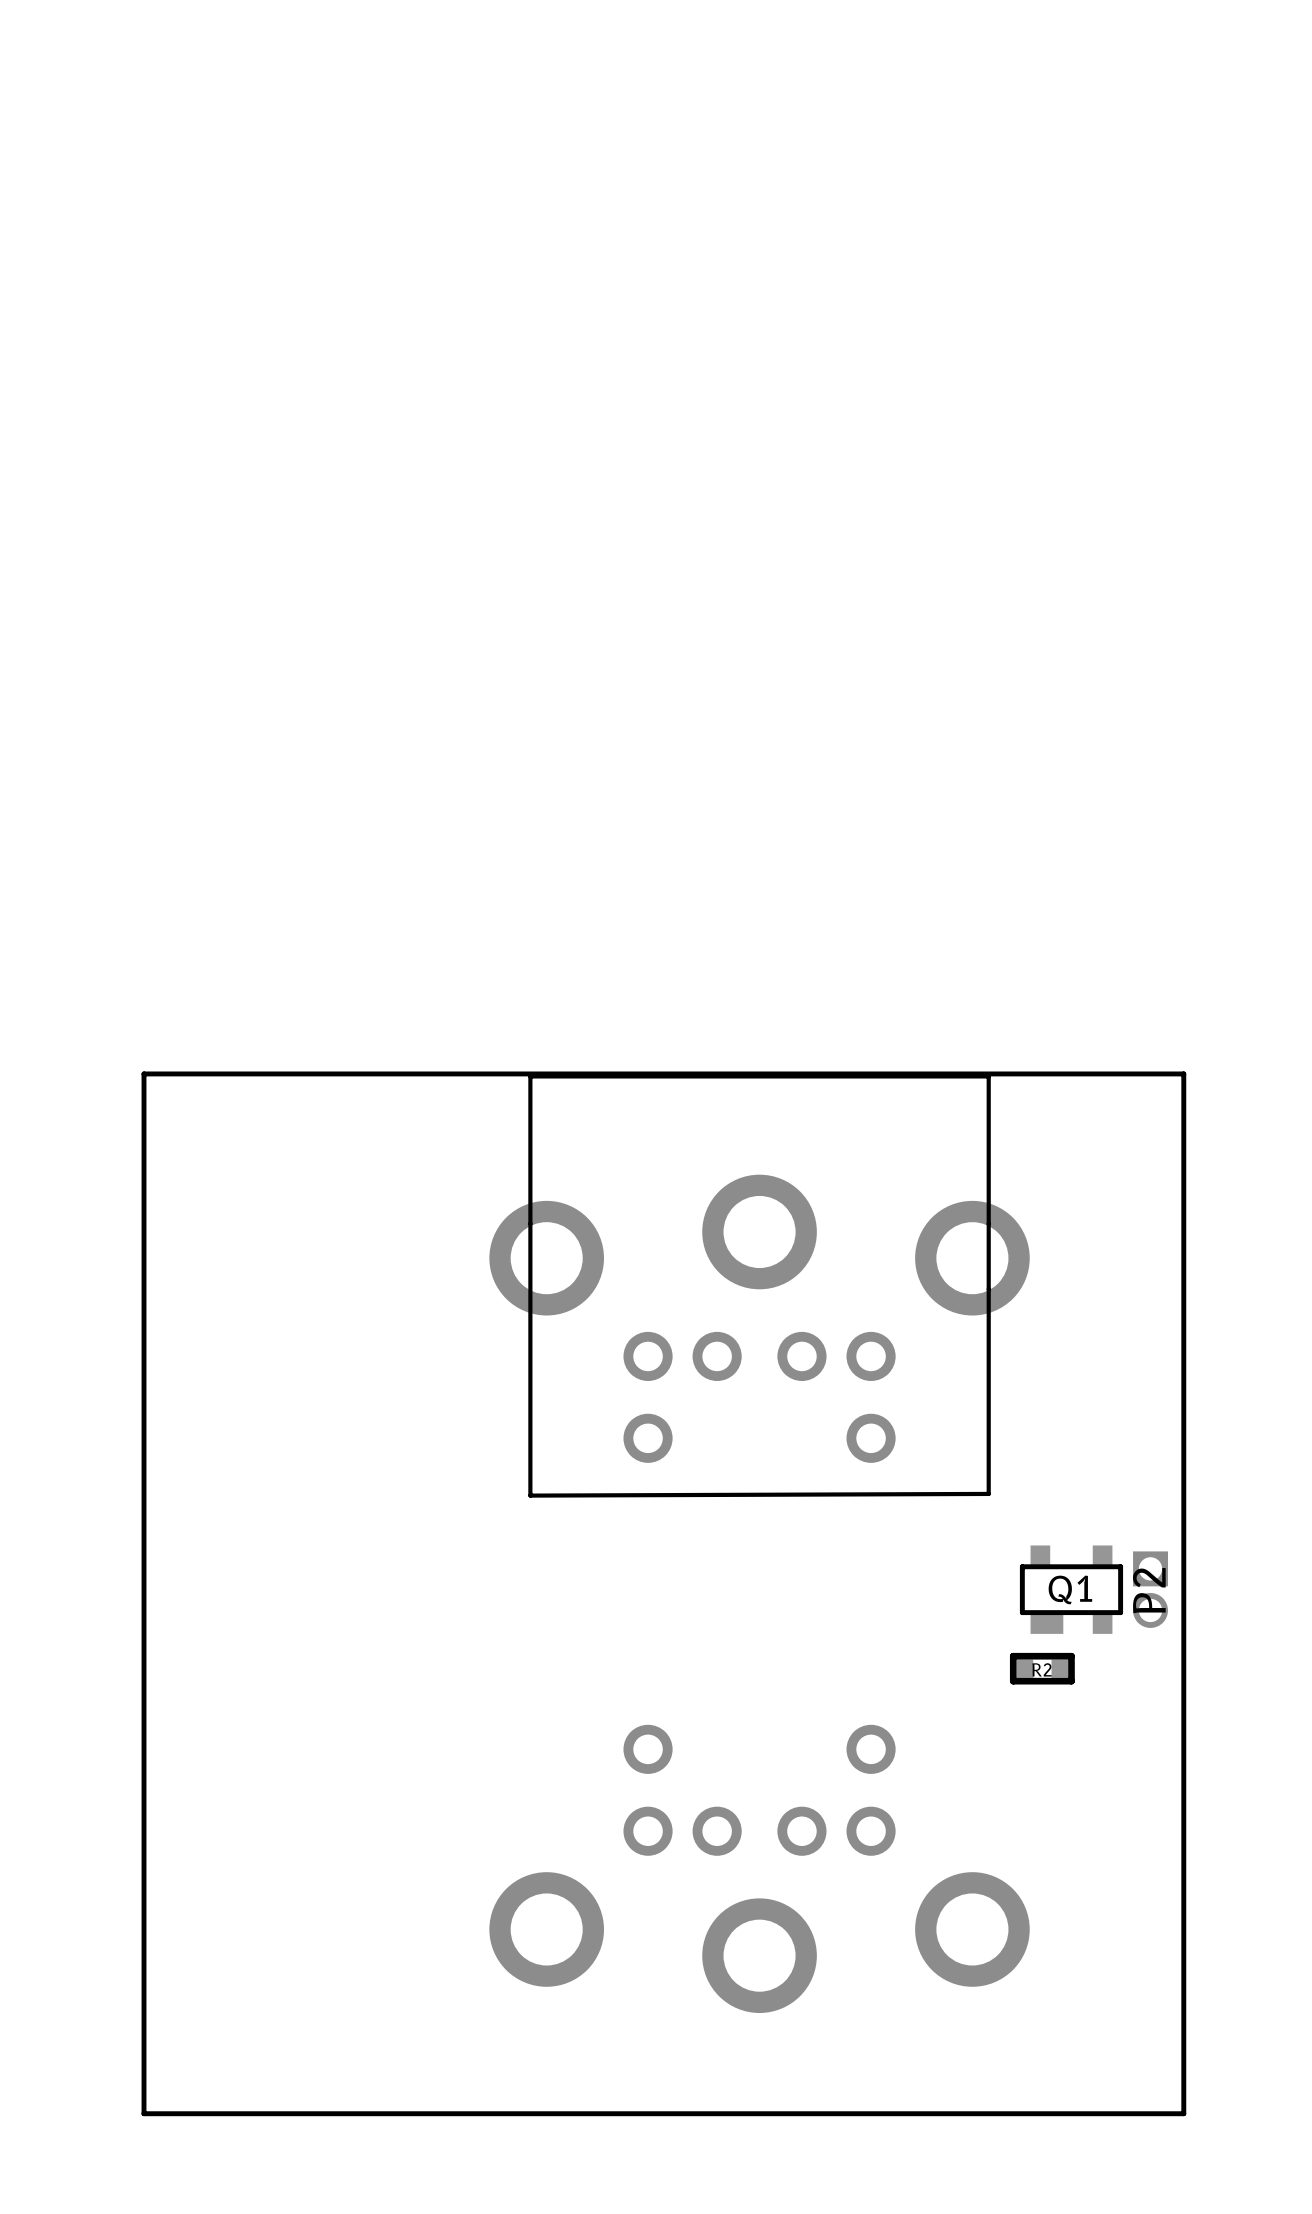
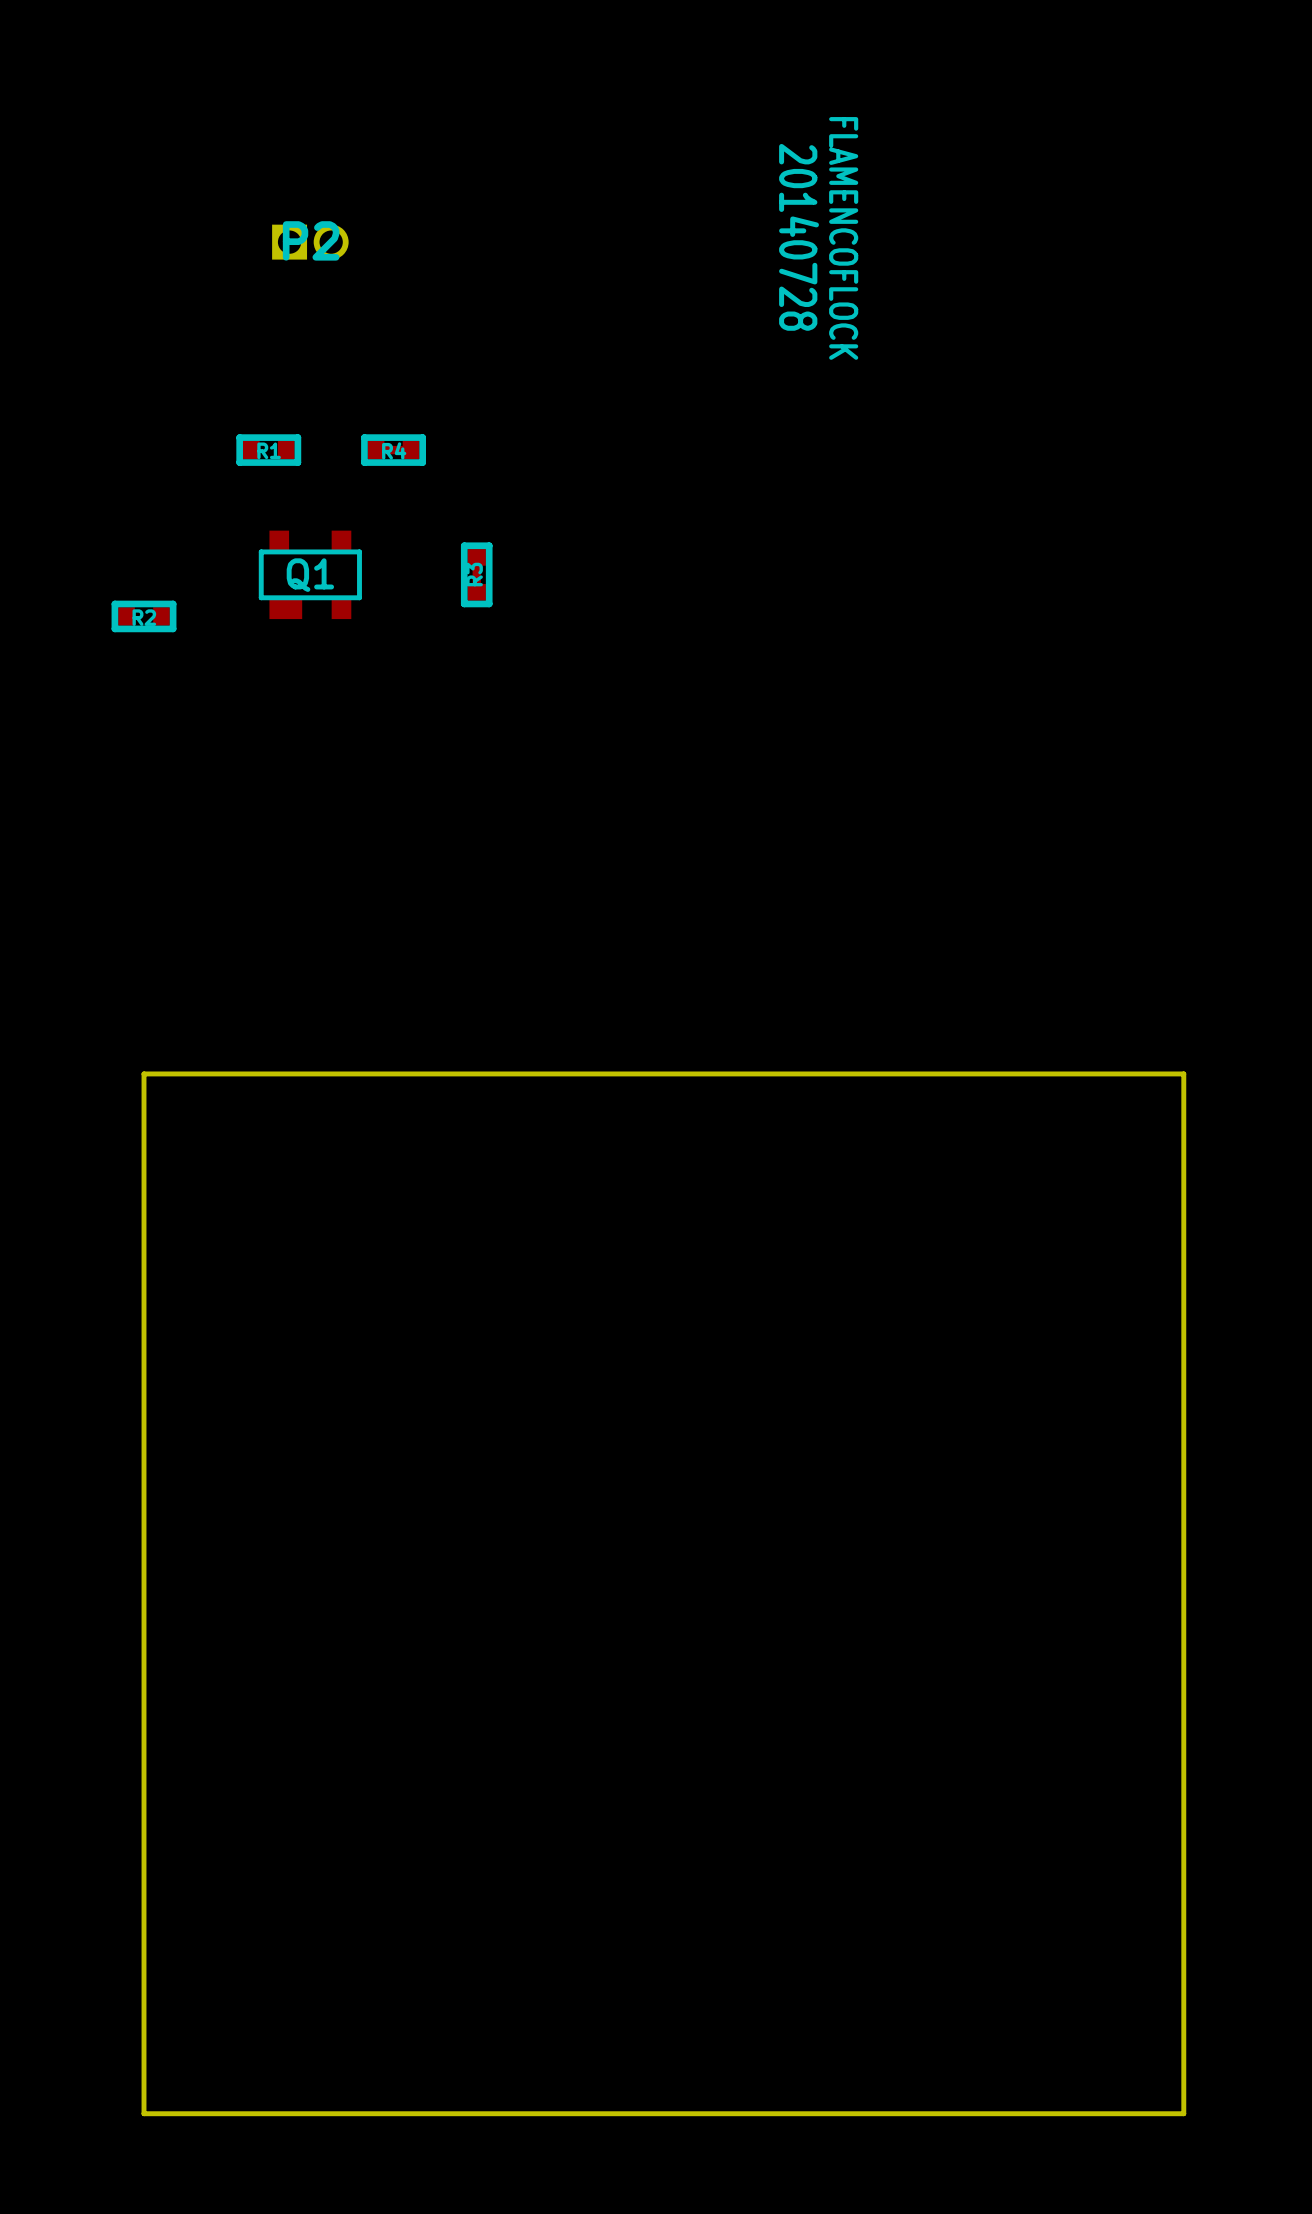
text: none -> 20140728 (799, 237)
text: none -> FLAMENCOFLOCK (843, 238)
R1: none -> (268, 450)
R4: none -> (393, 450)
R3: none -> (476, 574)
part: (759, 1286) -> none
Q1 position: (1071, 1589) -> (310, 574)
P2 rotation: 0° (1150, 1589) -> 90° counterclockwise (310, 242)
P2 position: (1150, 1589) -> (310, 242)
R2 position: (1042, 1668) -> (144, 616)
part: (759, 1868) -> none

